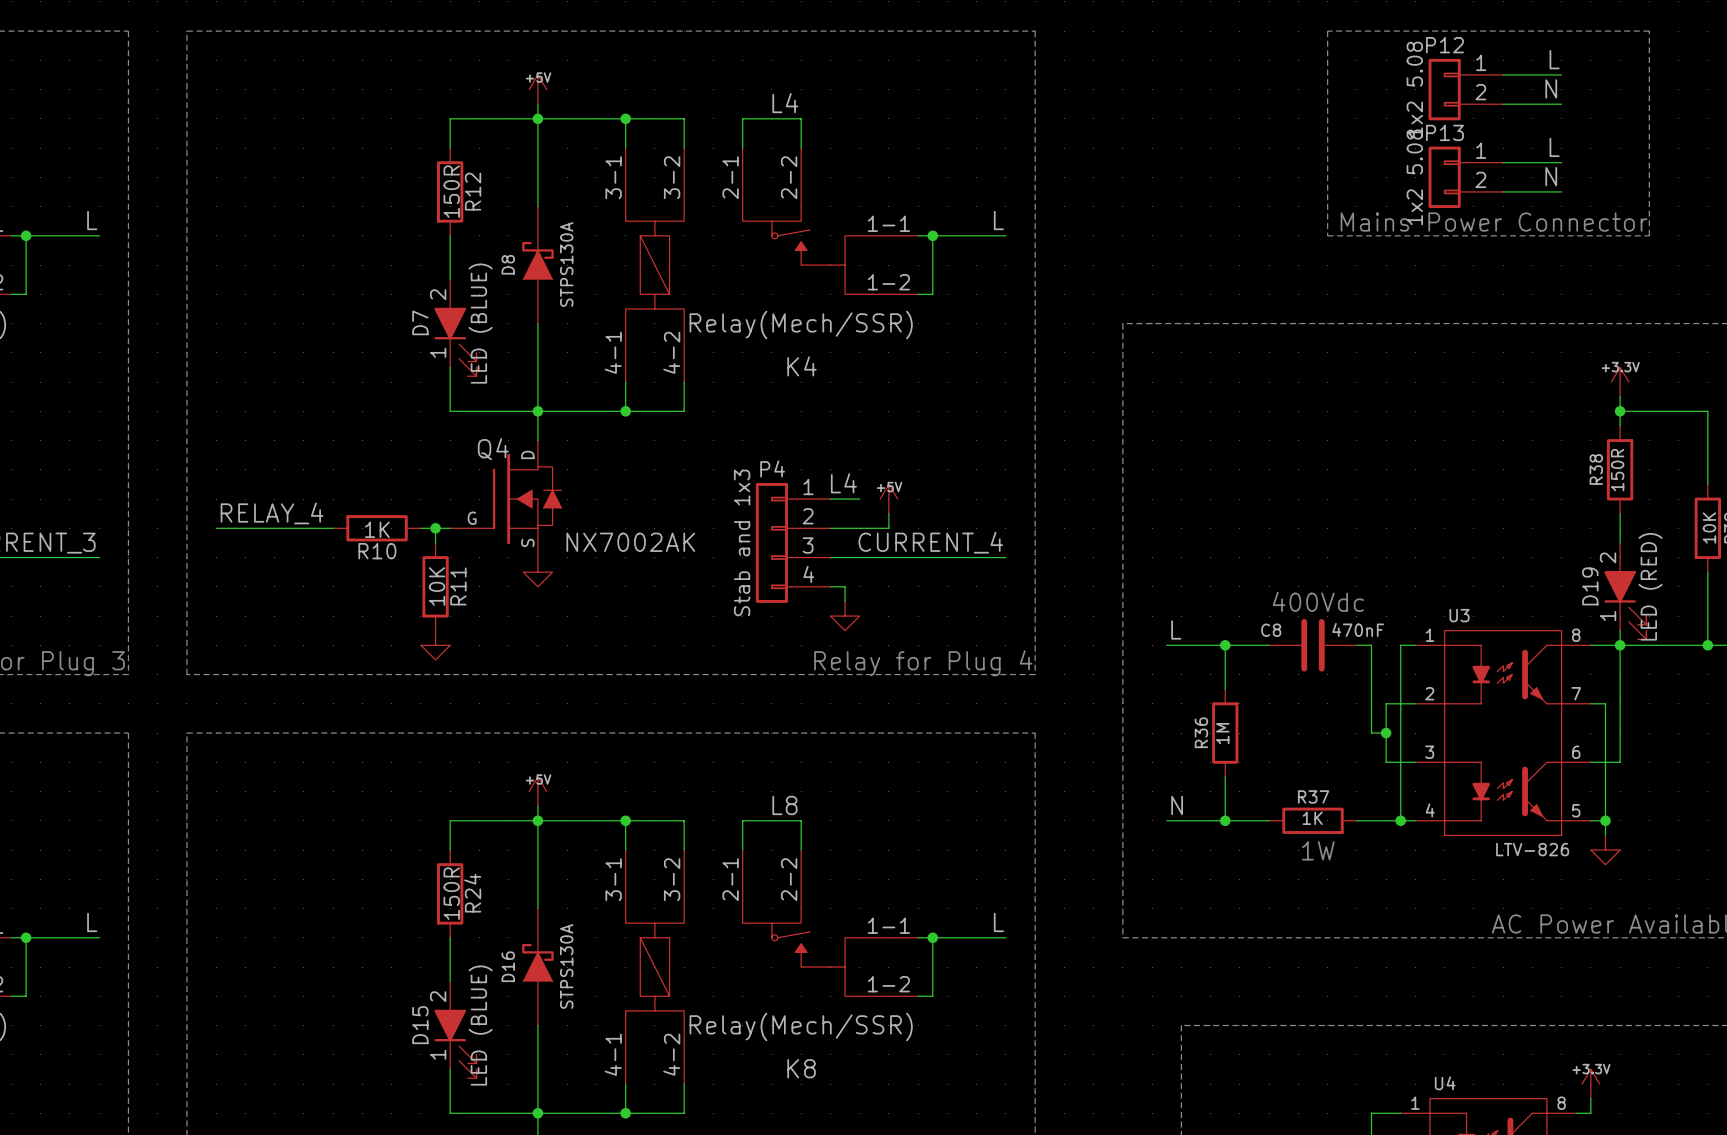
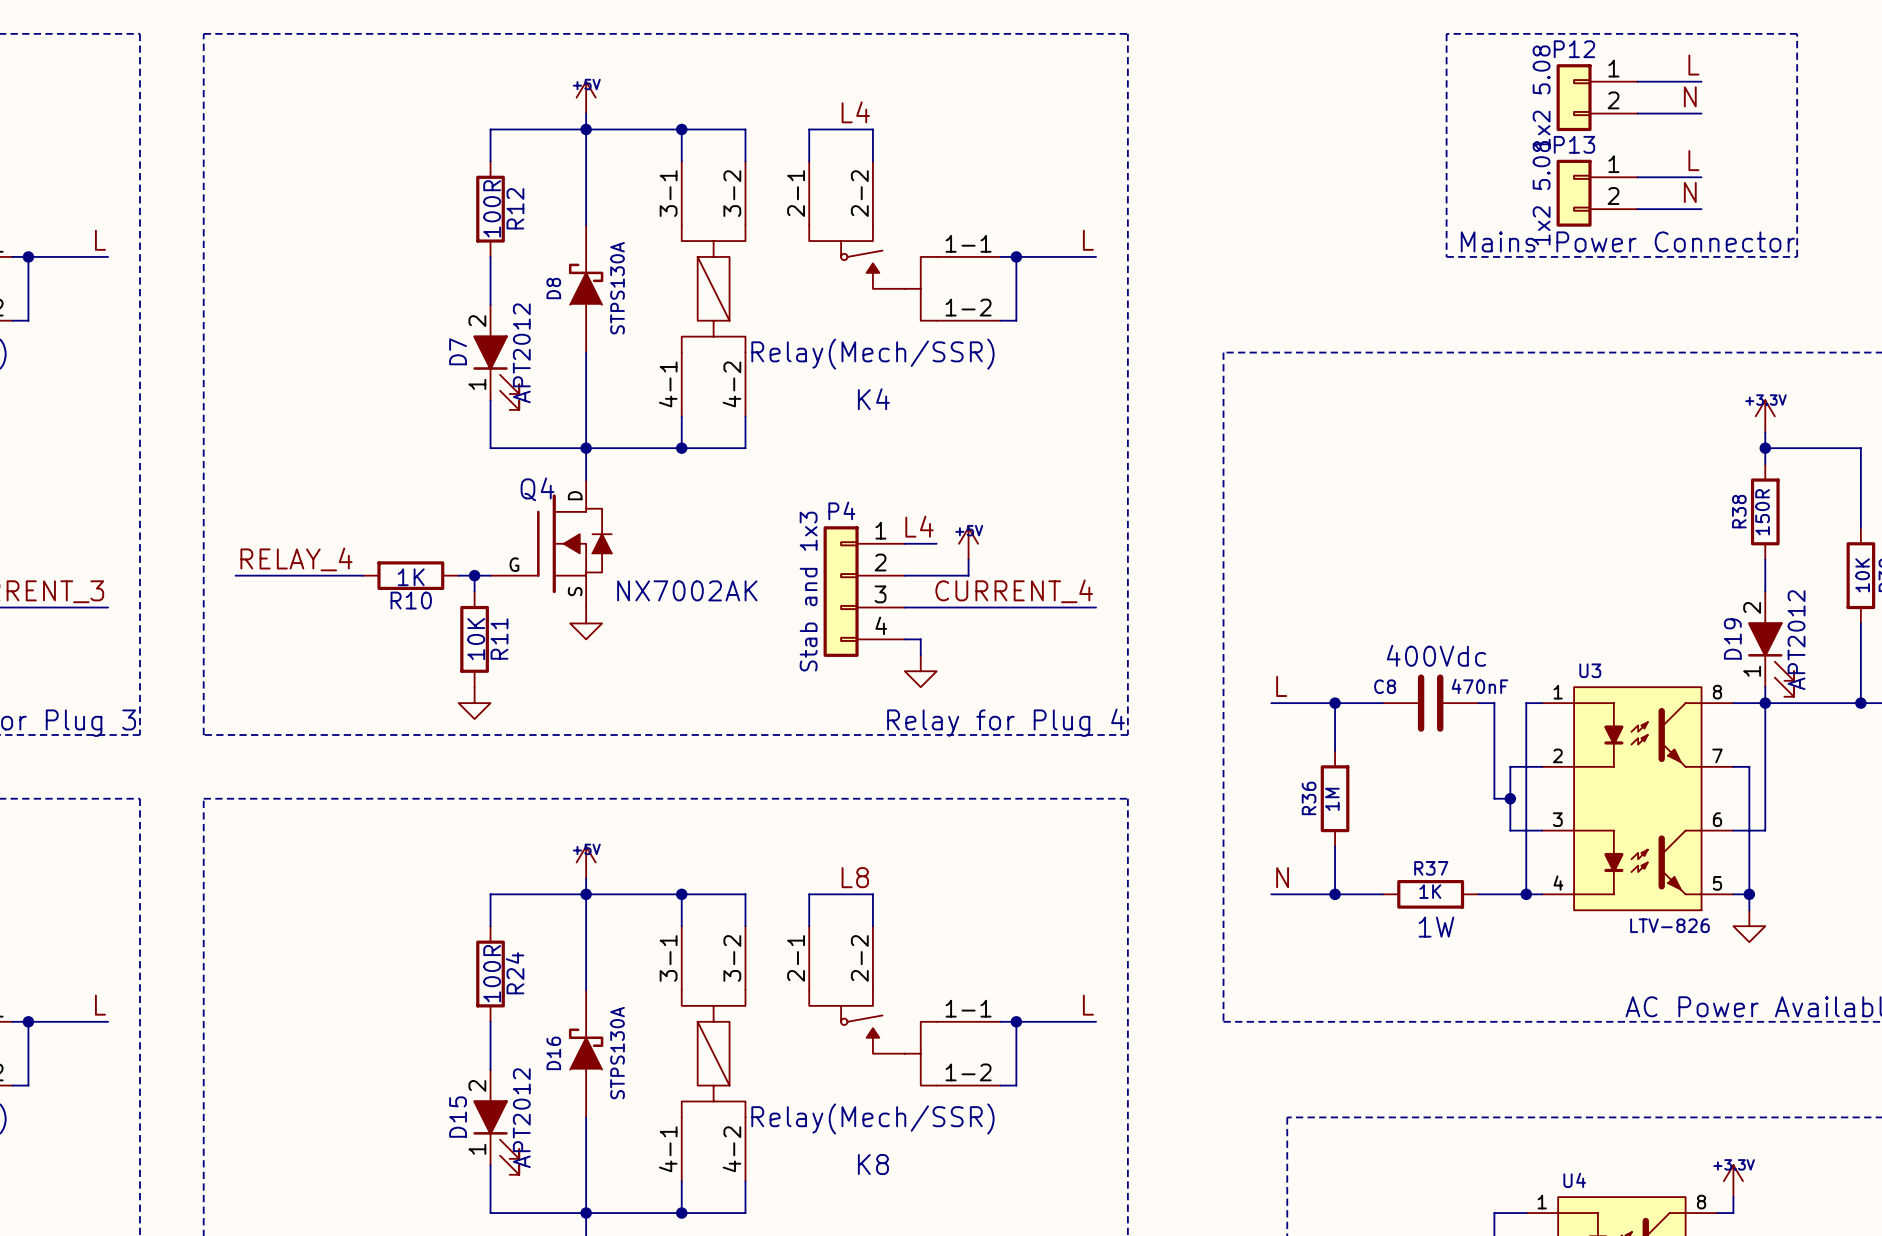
R12 value: 150R (451, 191) -> 100R (492, 208)
D7 value: LED (BLUE) (480, 323) -> APT2012 (521, 353)
D19 value: LED (RED) (1650, 586) -> APT2012 (1796, 640)
R24 value: 150R (451, 893) -> 100R (492, 973)
D15 value: LED (BLUE) (480, 1025) -> APT2012 (521, 1118)

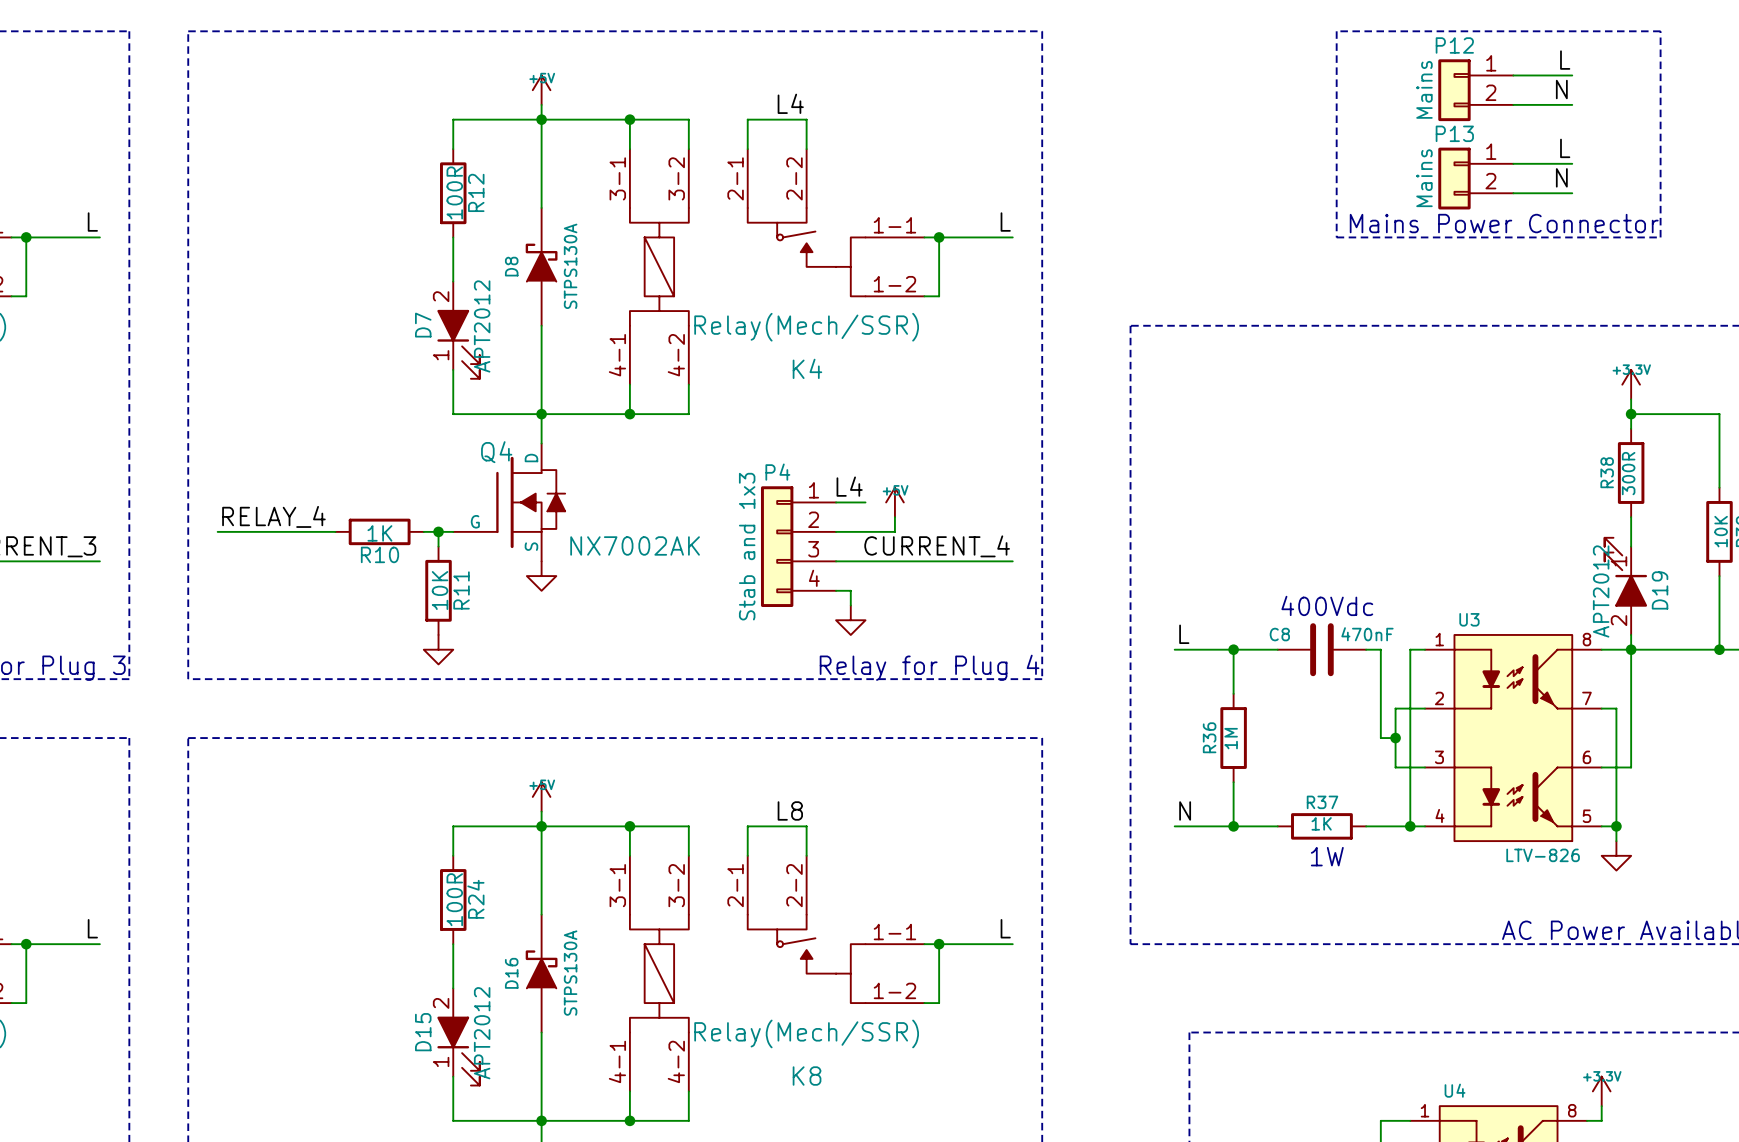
P12 value: 1x2 5.08 (1541, 97) -> Mains (1424, 89)
P13 value: 1x2 5.08 (1541, 193) -> Mains (1424, 178)
R38 value: 150R (1762, 512) -> 300R (1628, 473)
D19 rotation: 0° (1771, 659) -> 180° (1625, 572)

